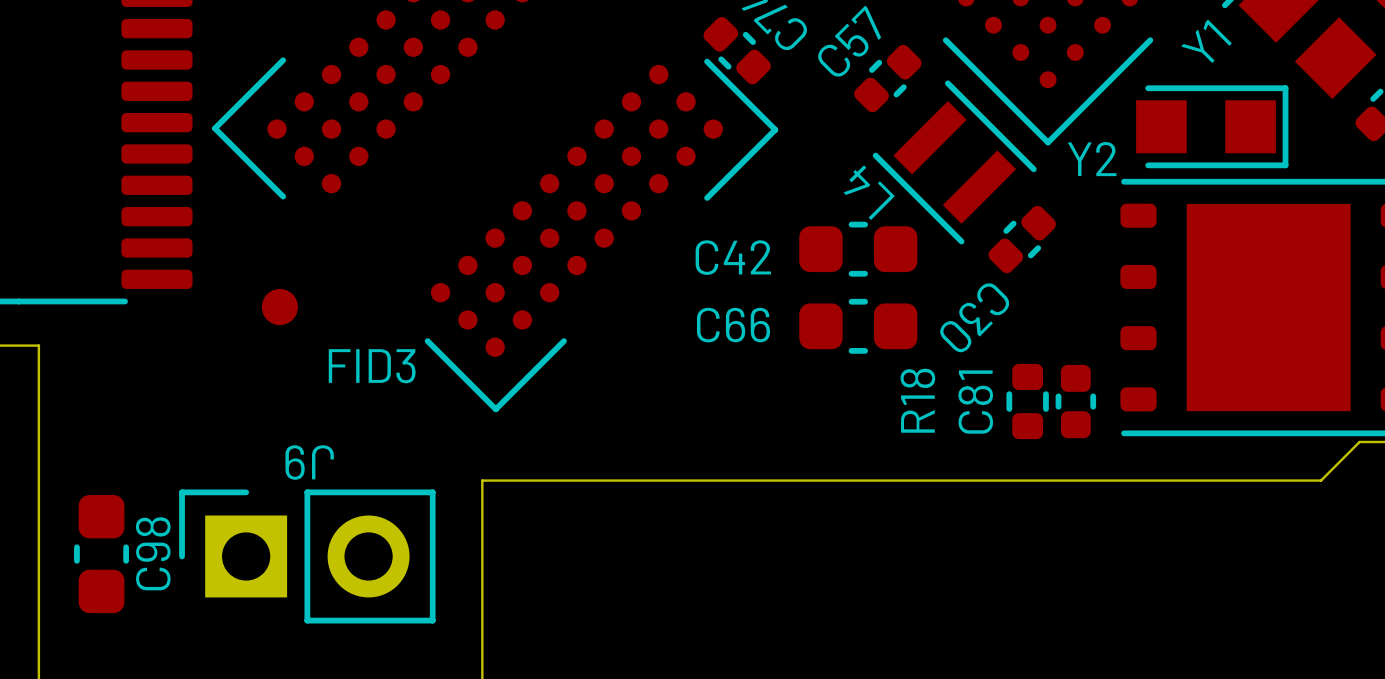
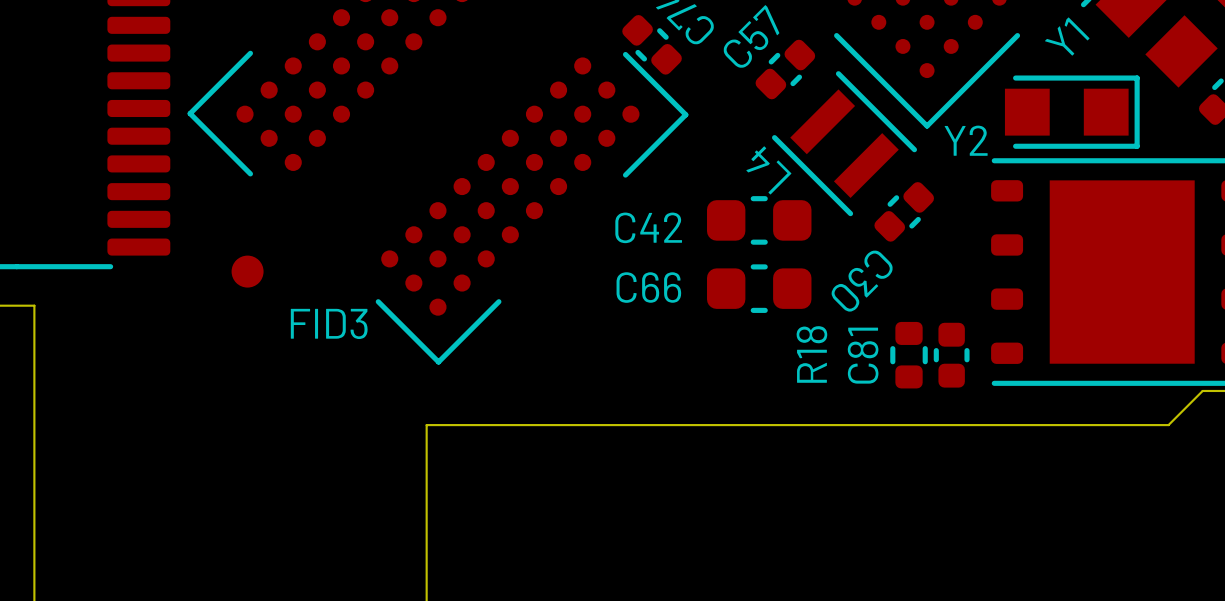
C98: (101, 554) -> none
J9: (307, 556) -> none

